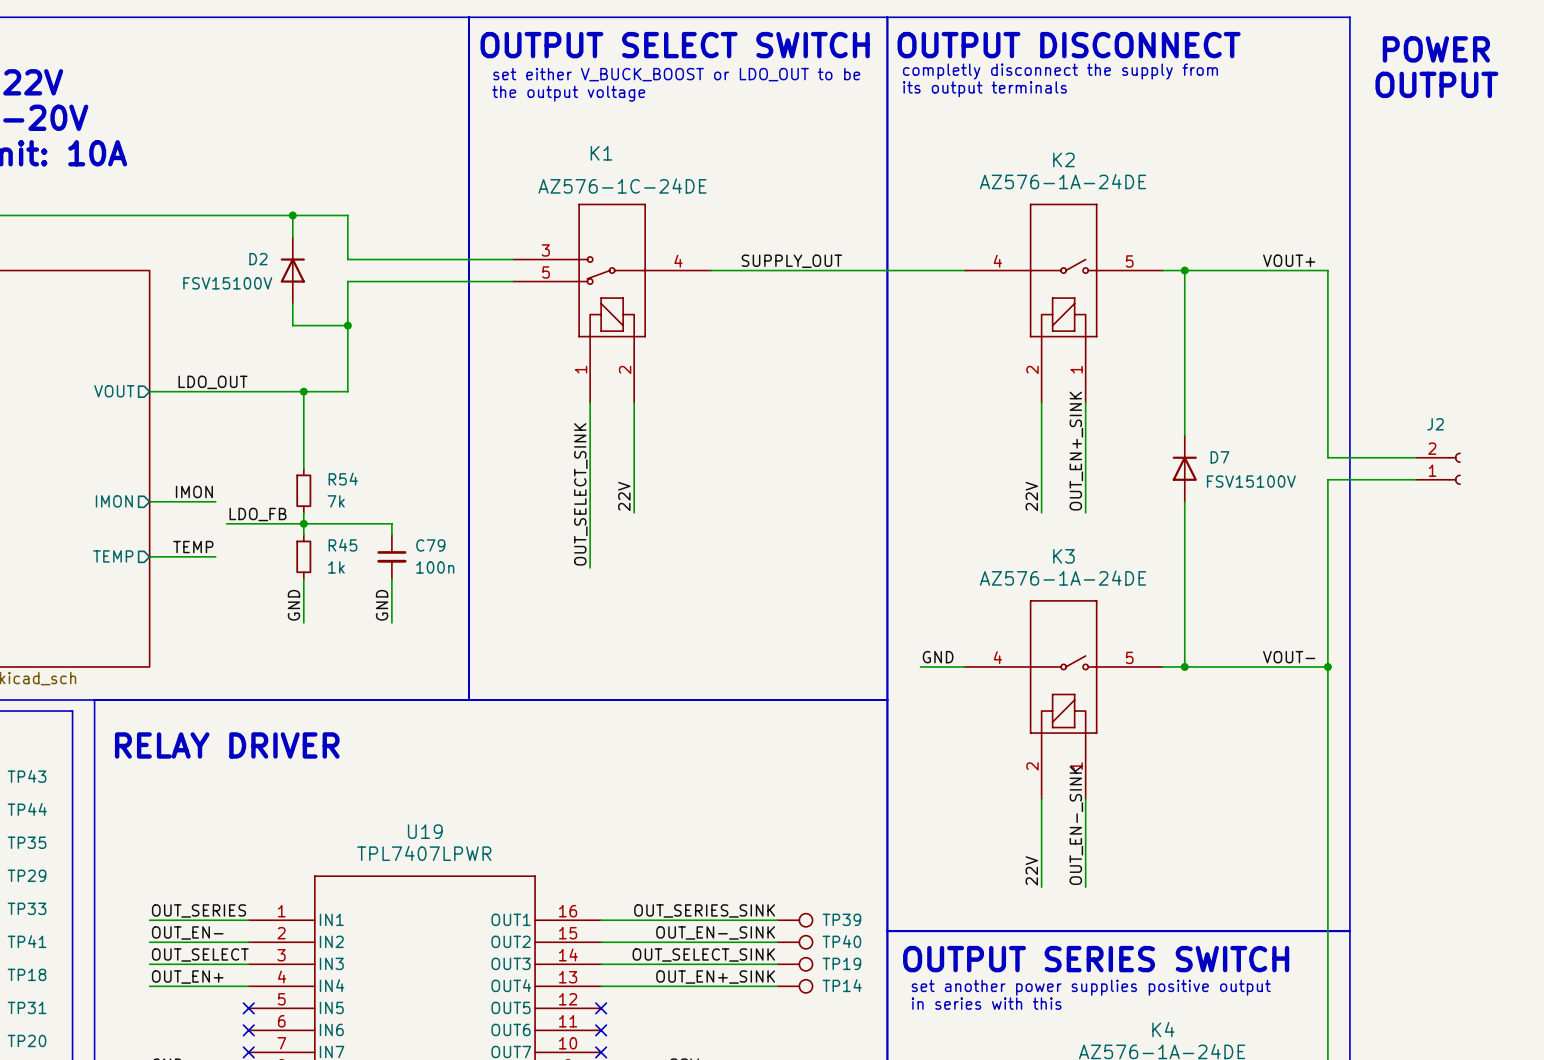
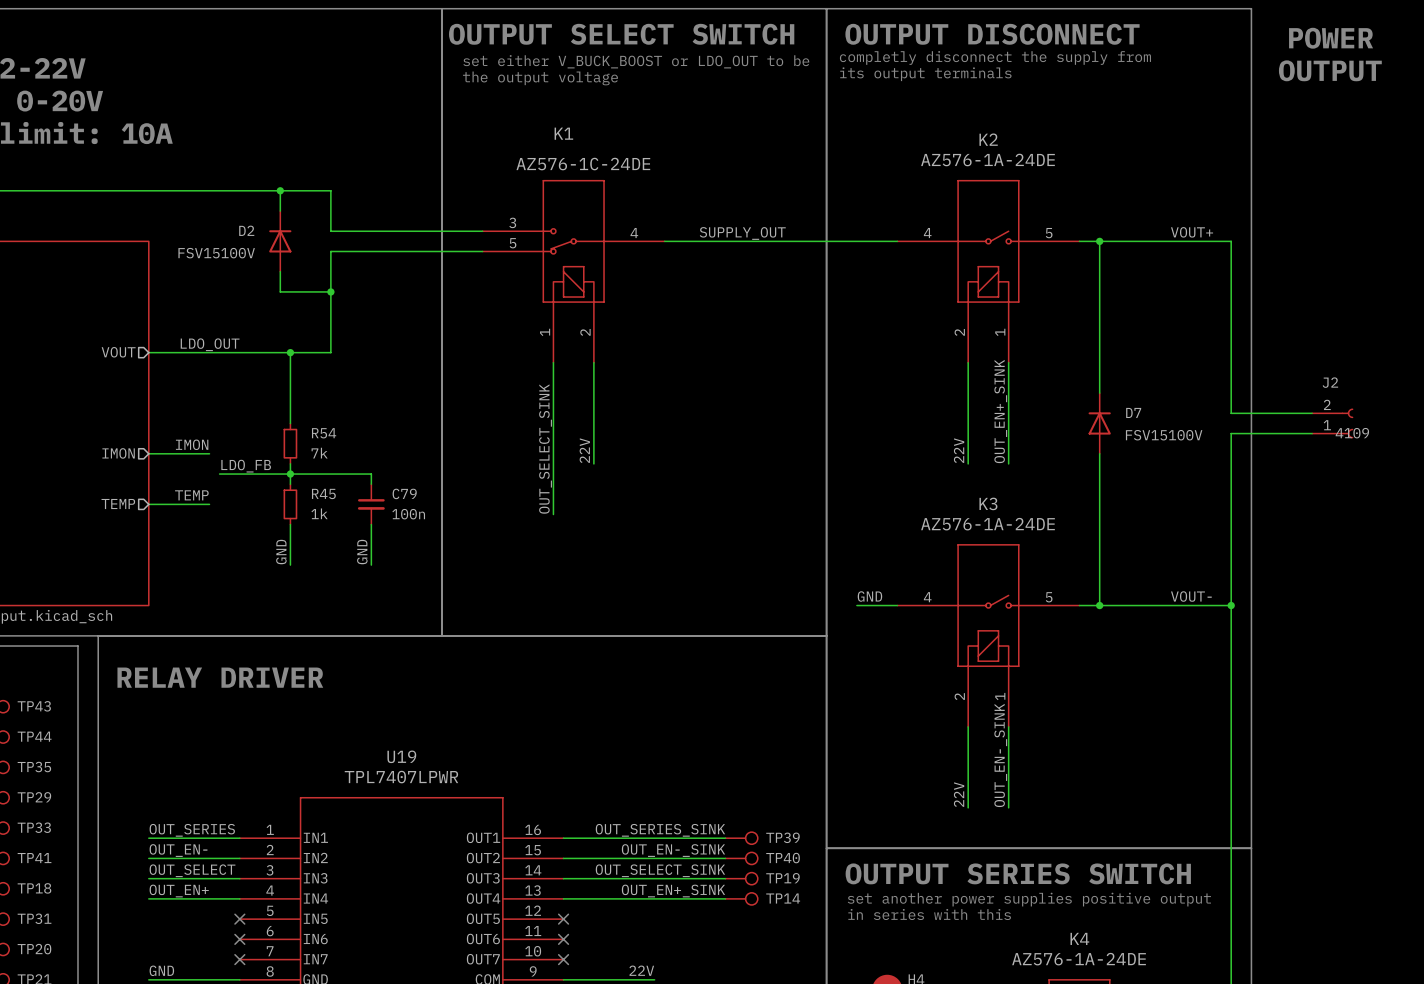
J2 text: none -> 4109 (1352, 433)

